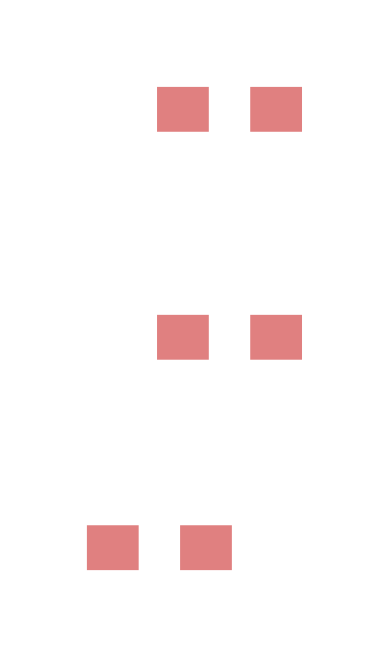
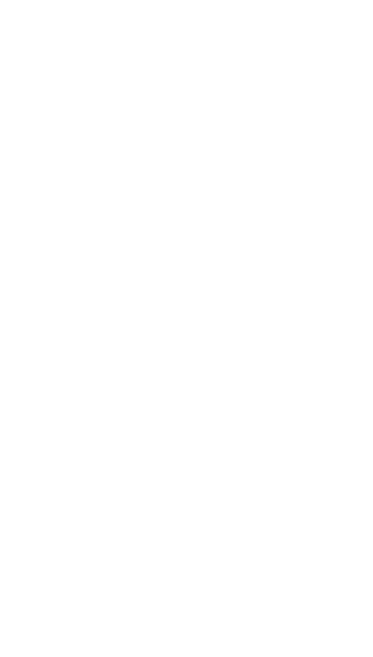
part: (229, 109) -> none
part: (229, 337) -> none
part: (159, 547) -> none

